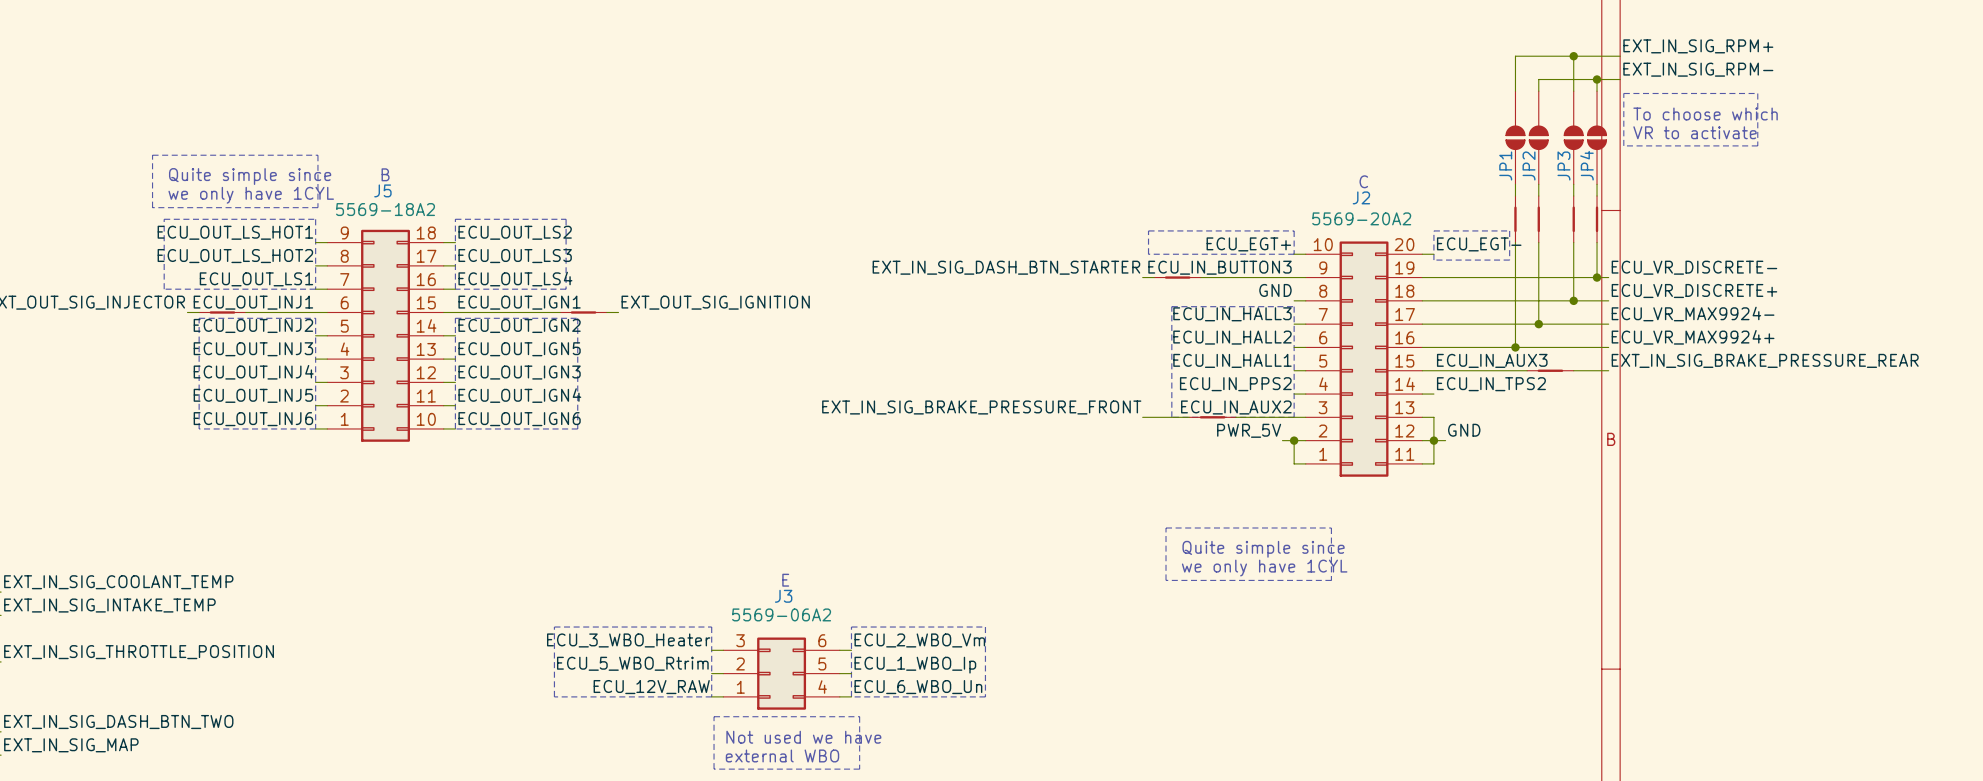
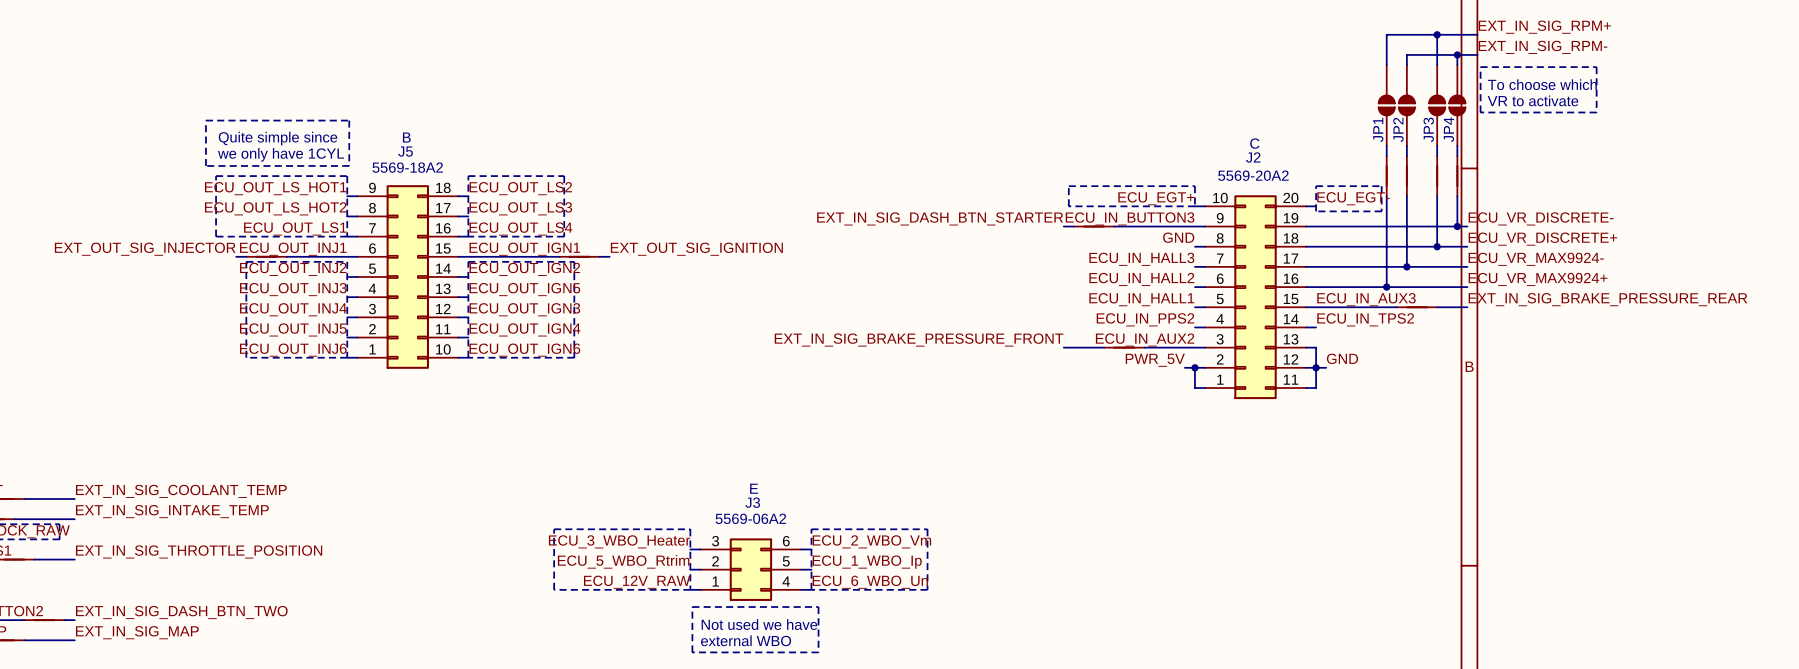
line: (1171, 306) (1294, 306) (1294, 417) (1171, 417) (1171, 306) -> none
line: (1166, 528) (1331, 528) (1331, 580) (1166, 580) (1166, 528) -> none
text: Quite simple since (1263, 549) -> none
text: we only have 1CYL (1264, 568) -> none

